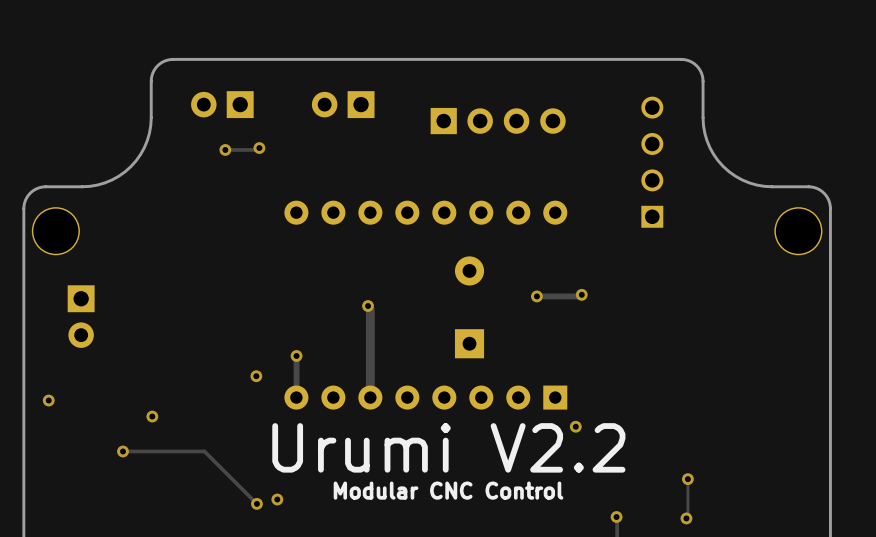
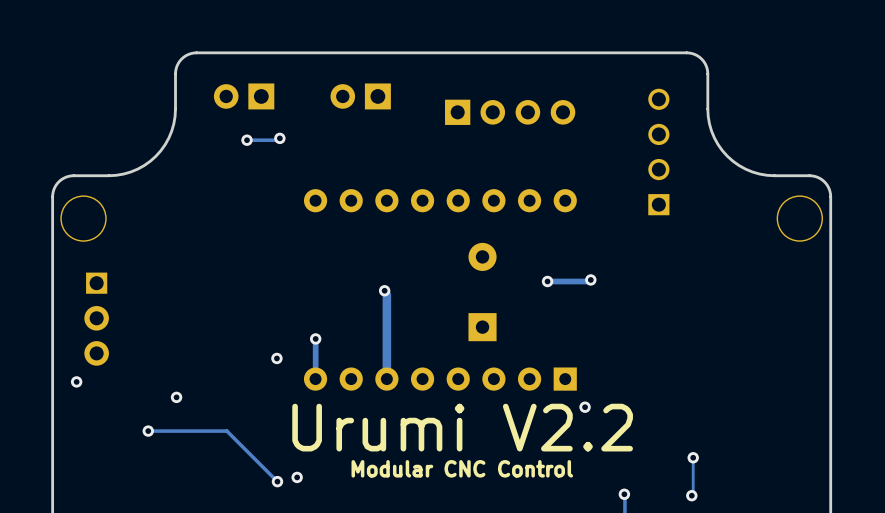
part: (81, 316) -> none
part: none -> (96, 319)

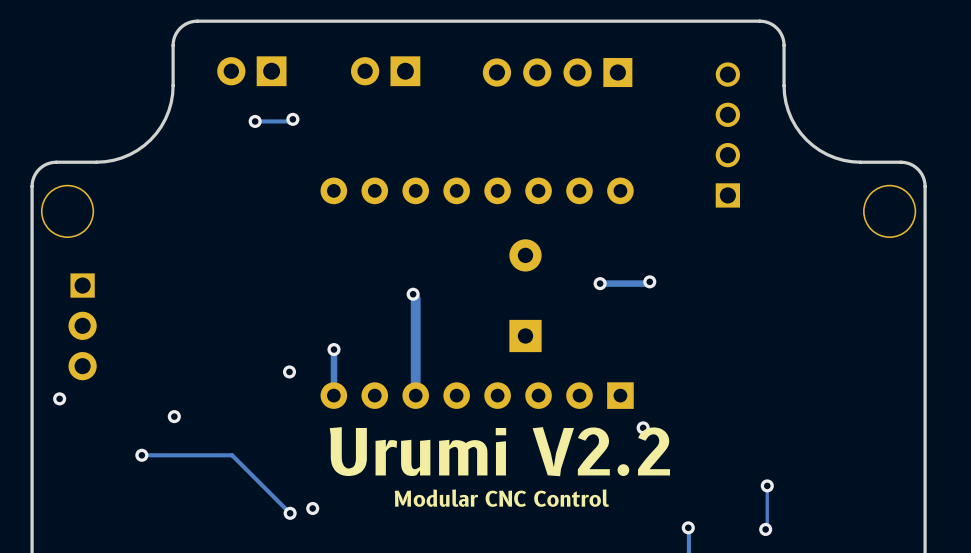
part rotation: 0° (510, 112) -> 180° (557, 72)

